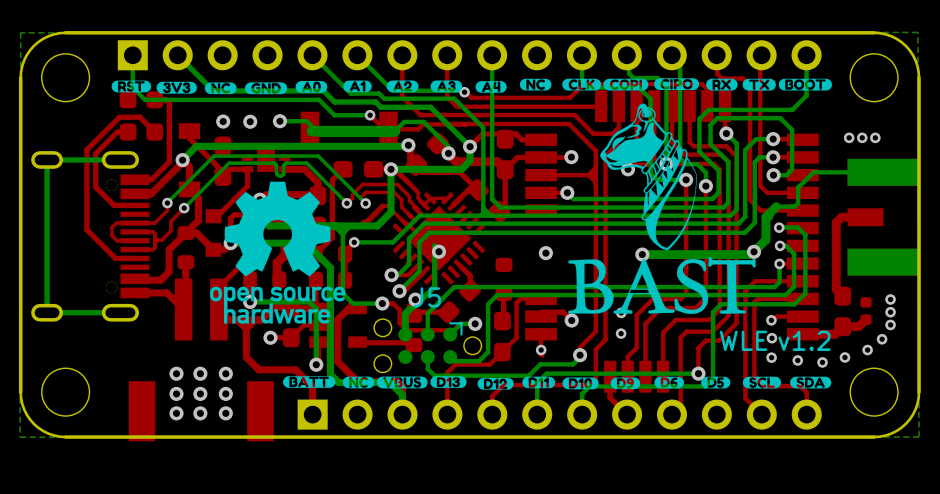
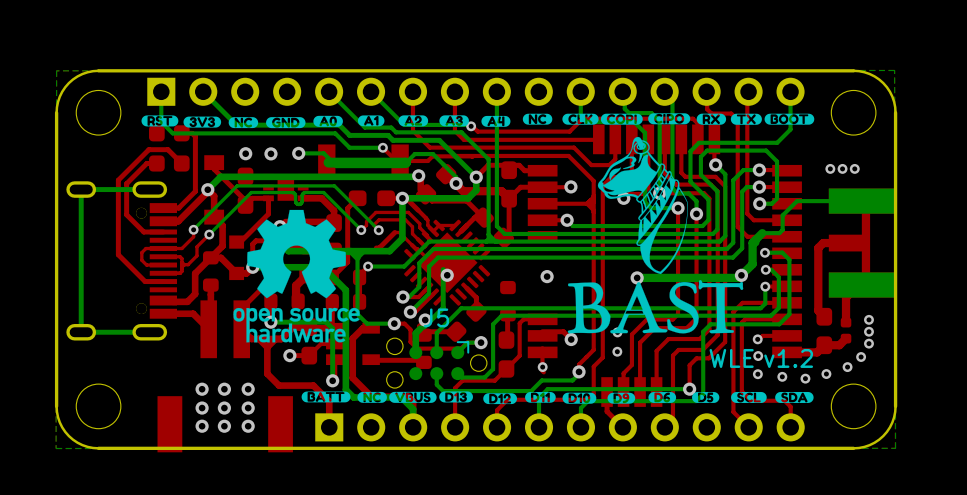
top track: none -> (858, 201) (865, 208) (865, 277) (846, 297) (846, 322)

